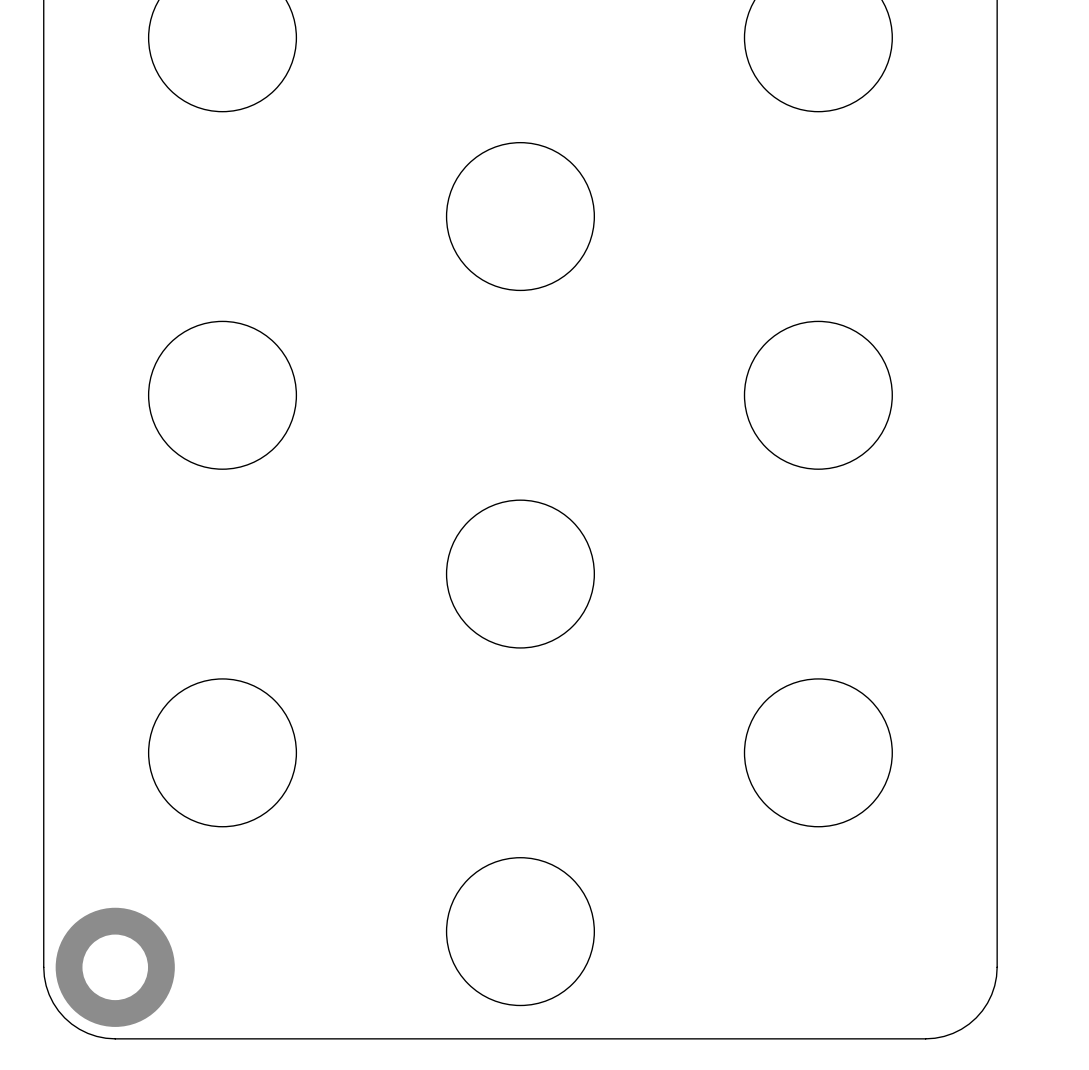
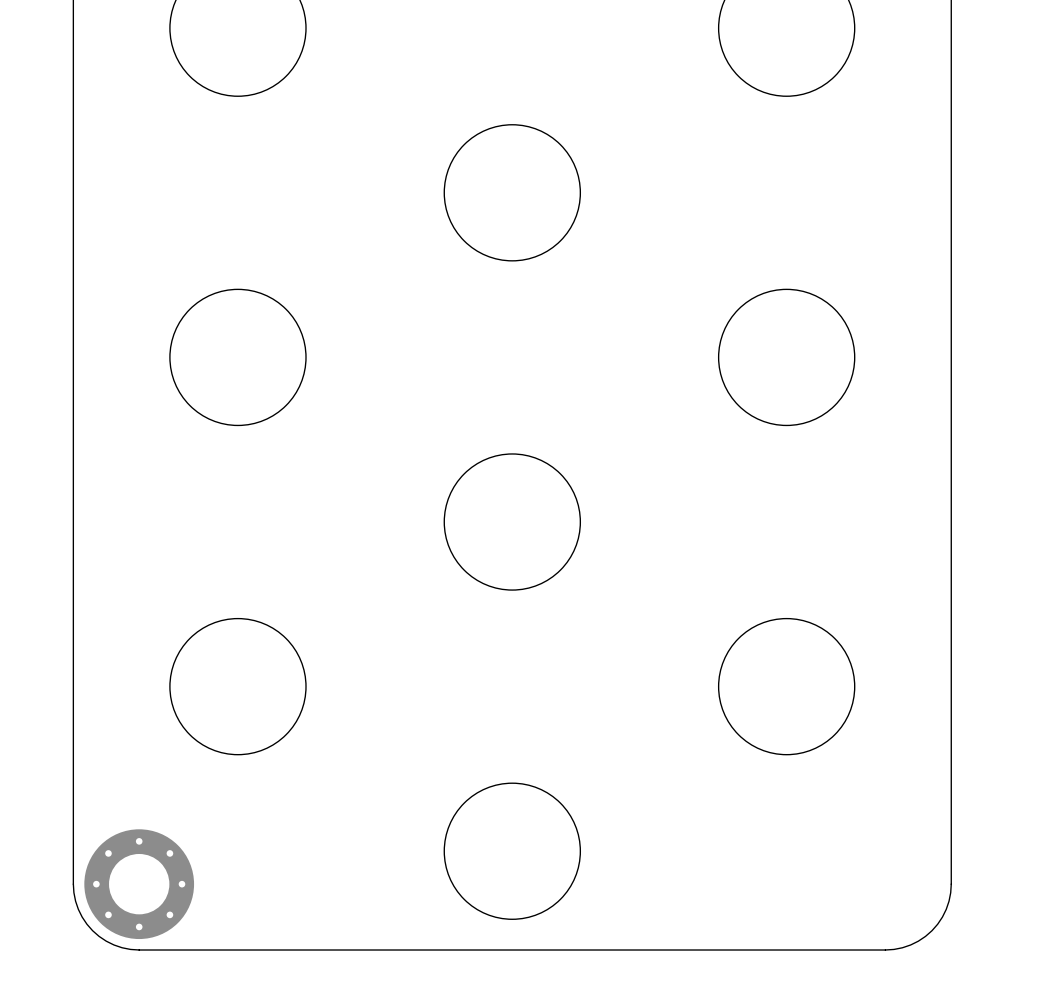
via: (115, 967) -> none
part: none -> (139, 884)

